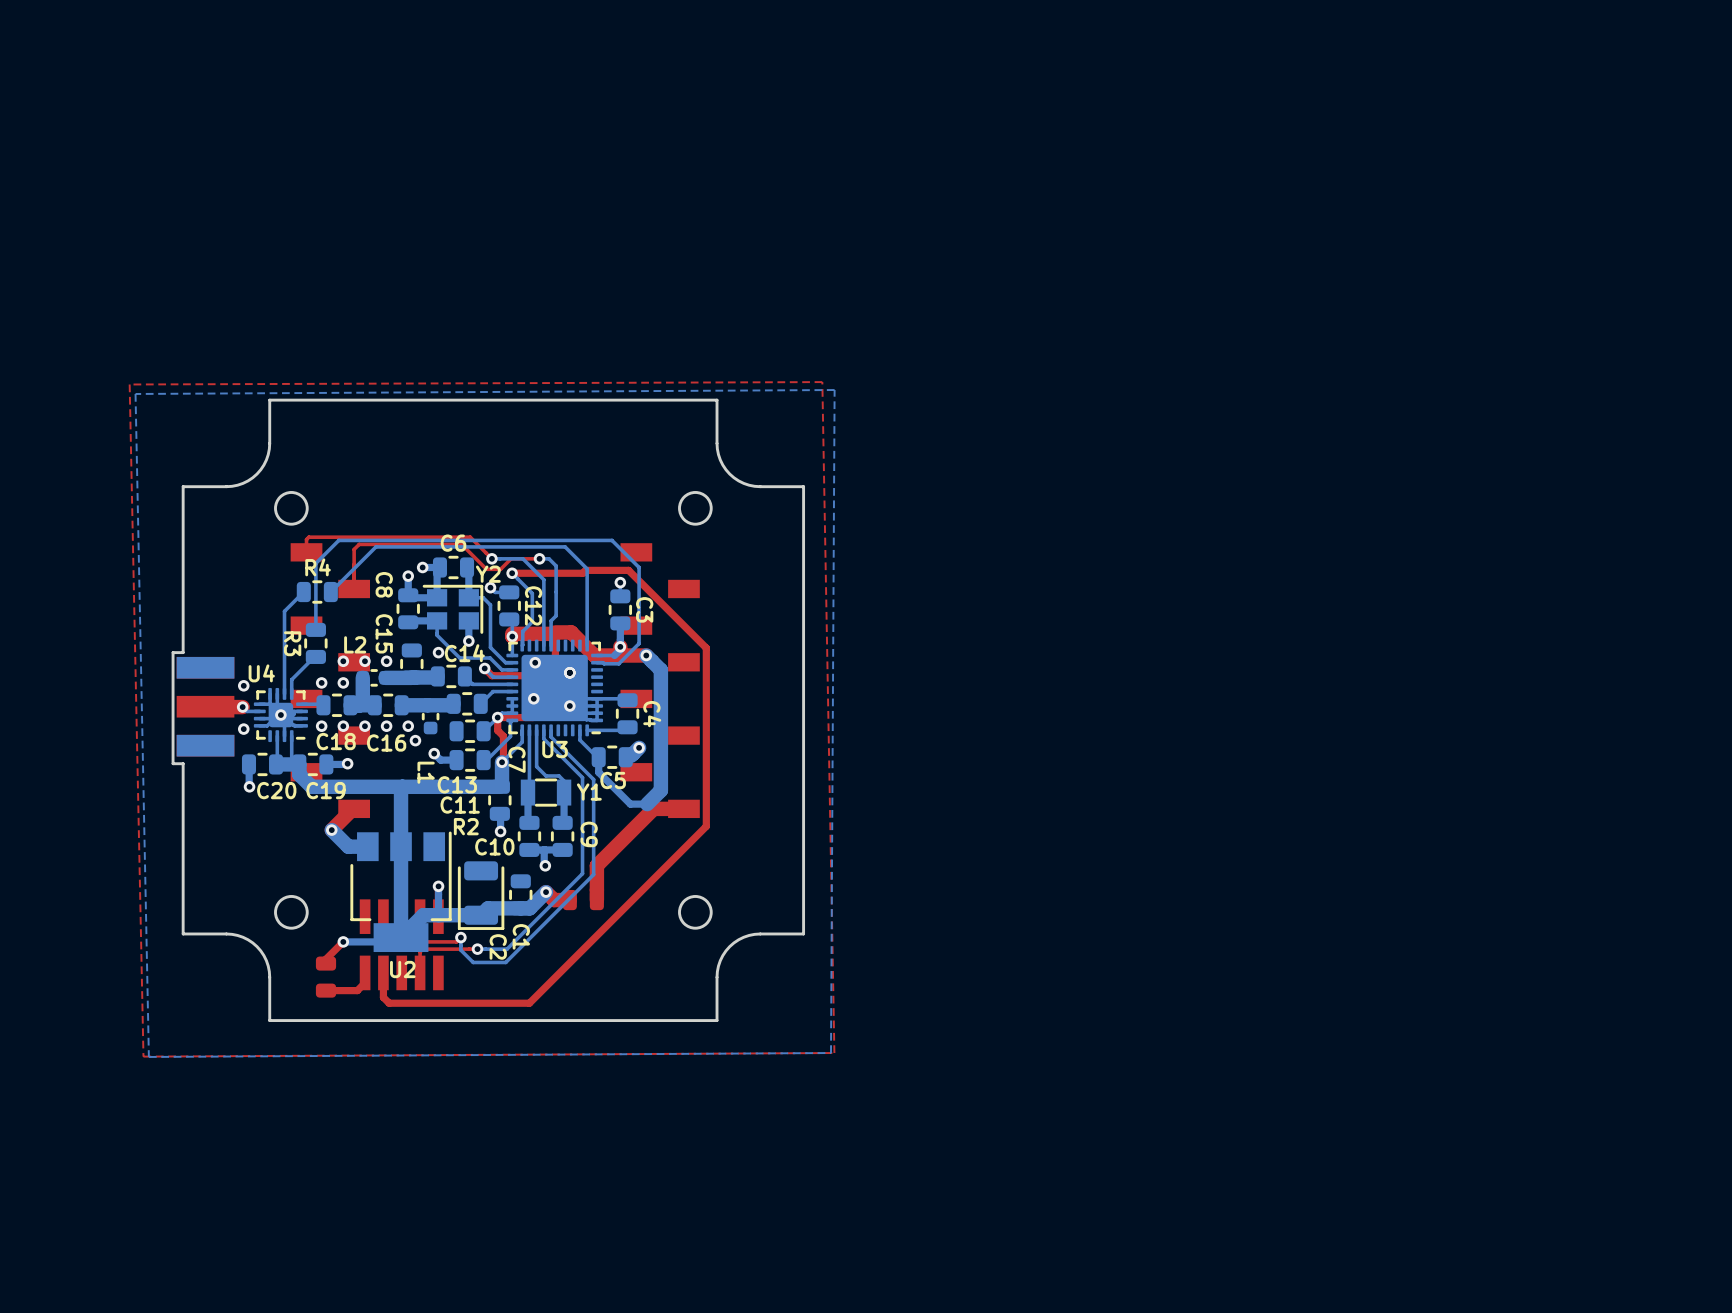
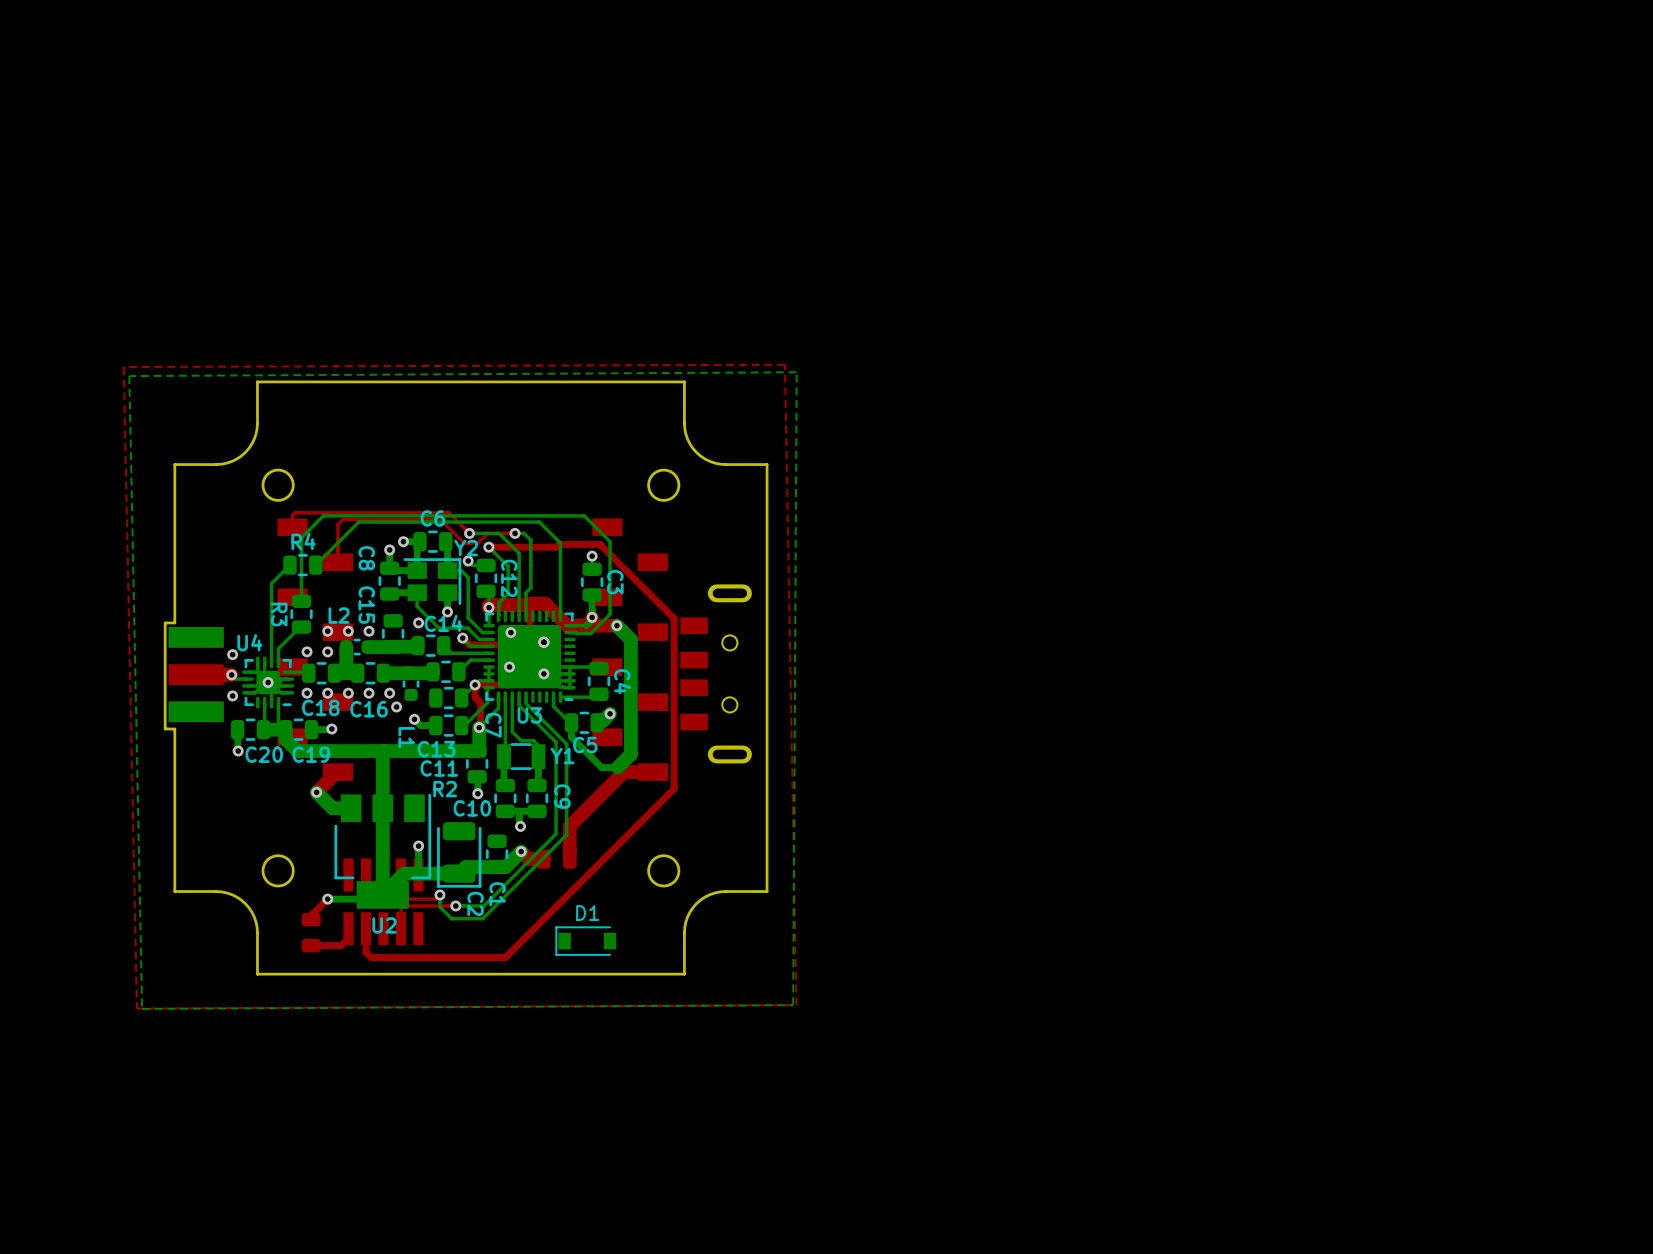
part: none -> (716, 673)
D1: none -> (585, 941)

